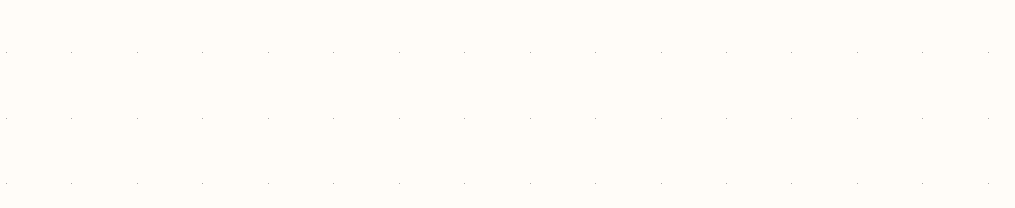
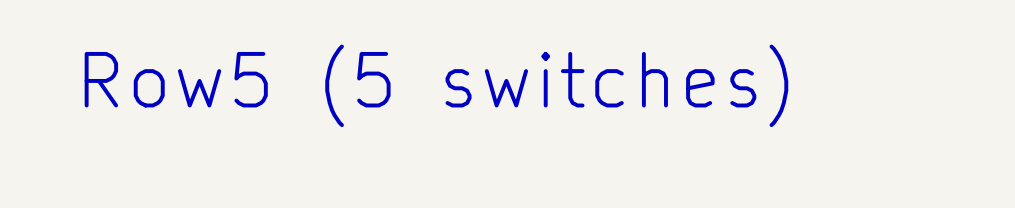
text: none -> Row5 (5 switches) (436, 85)

